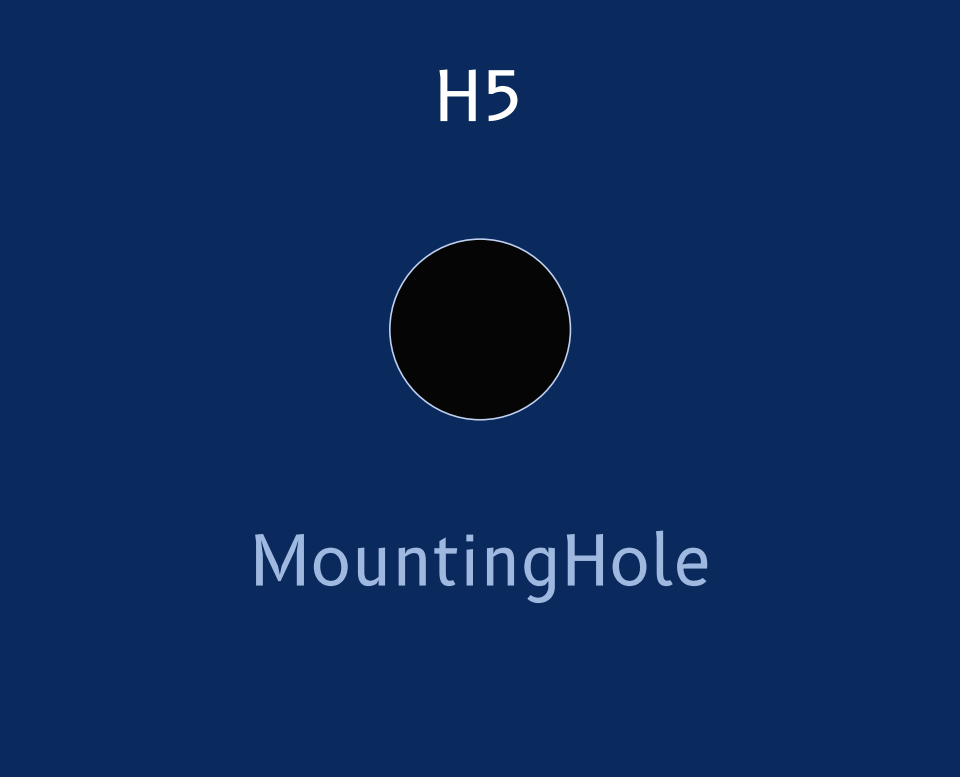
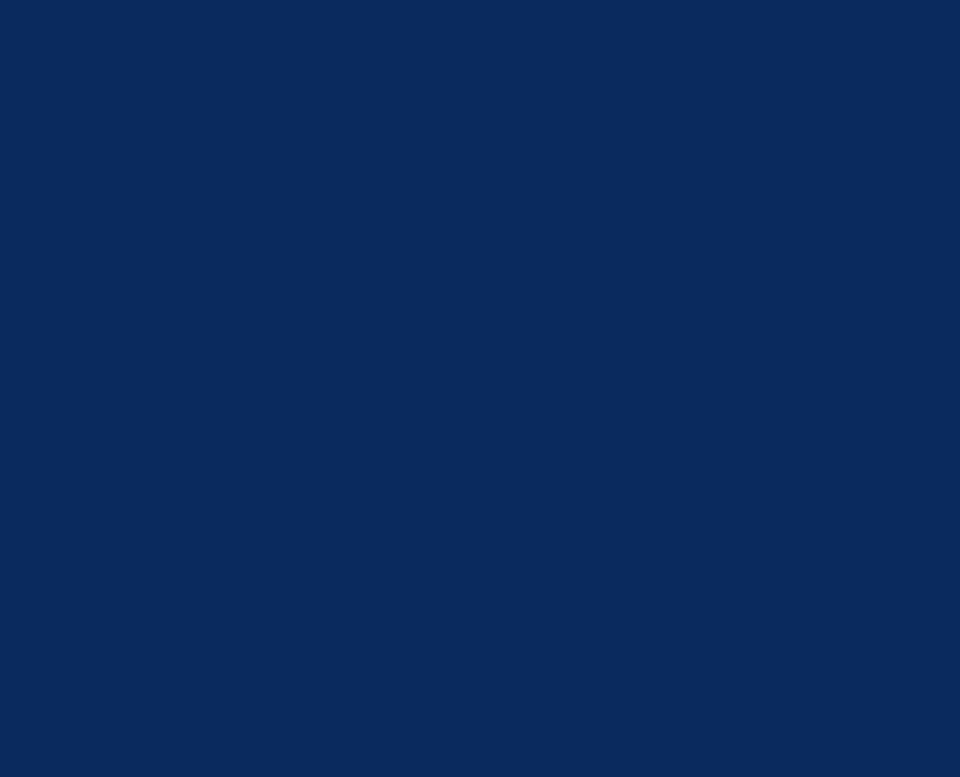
H5: MountingHole (480, 329) -> none

